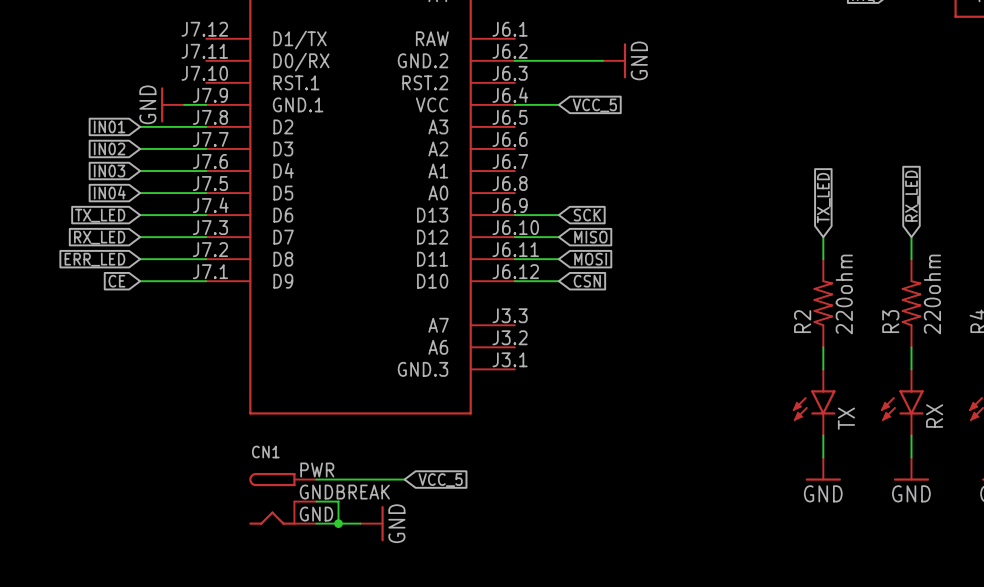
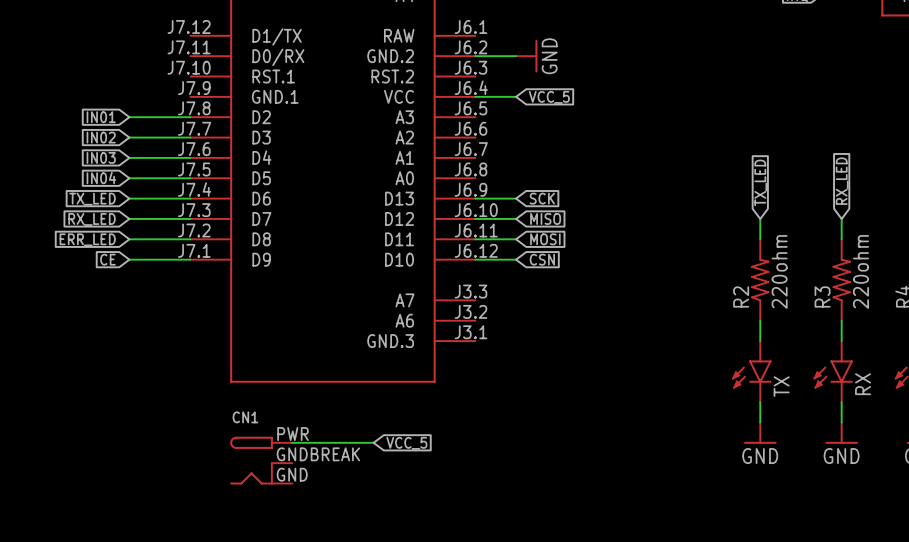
power symbol position: GND (614, 60) -> GND (526, 56)
power symbol: GND (172, 104) -> none
wire: (184, 104) (206, 104) -> none
wire: (316, 501) (338, 501) (338, 523) -> none
wire: (316, 523) (360, 523) -> none
junction: (338, 523) -> none
power symbol: GND (372, 523) -> none

